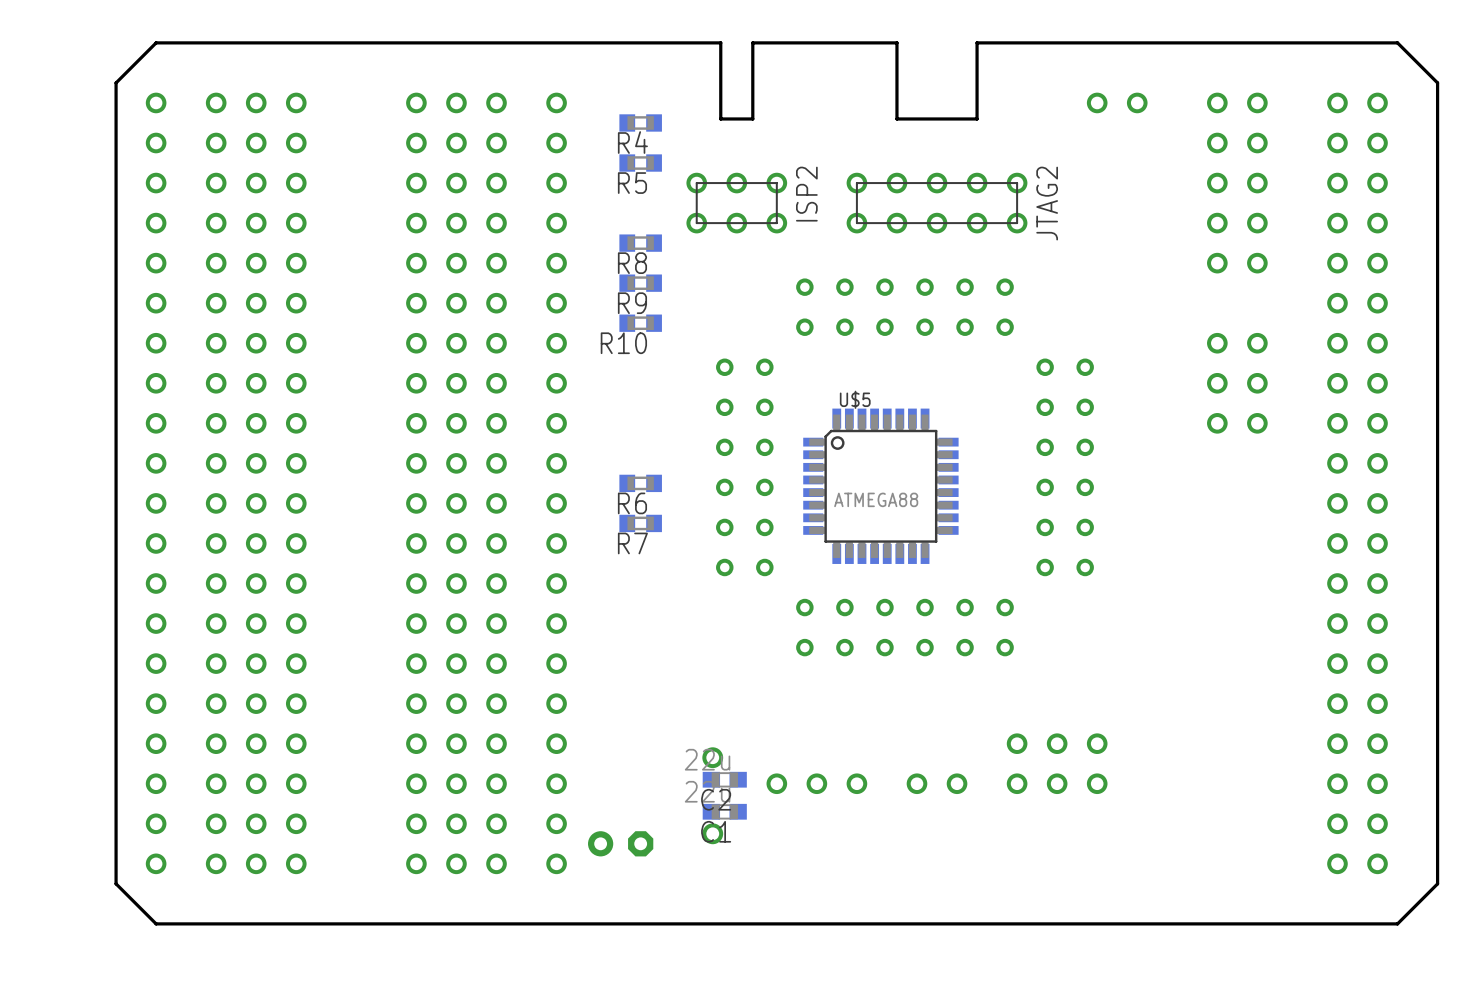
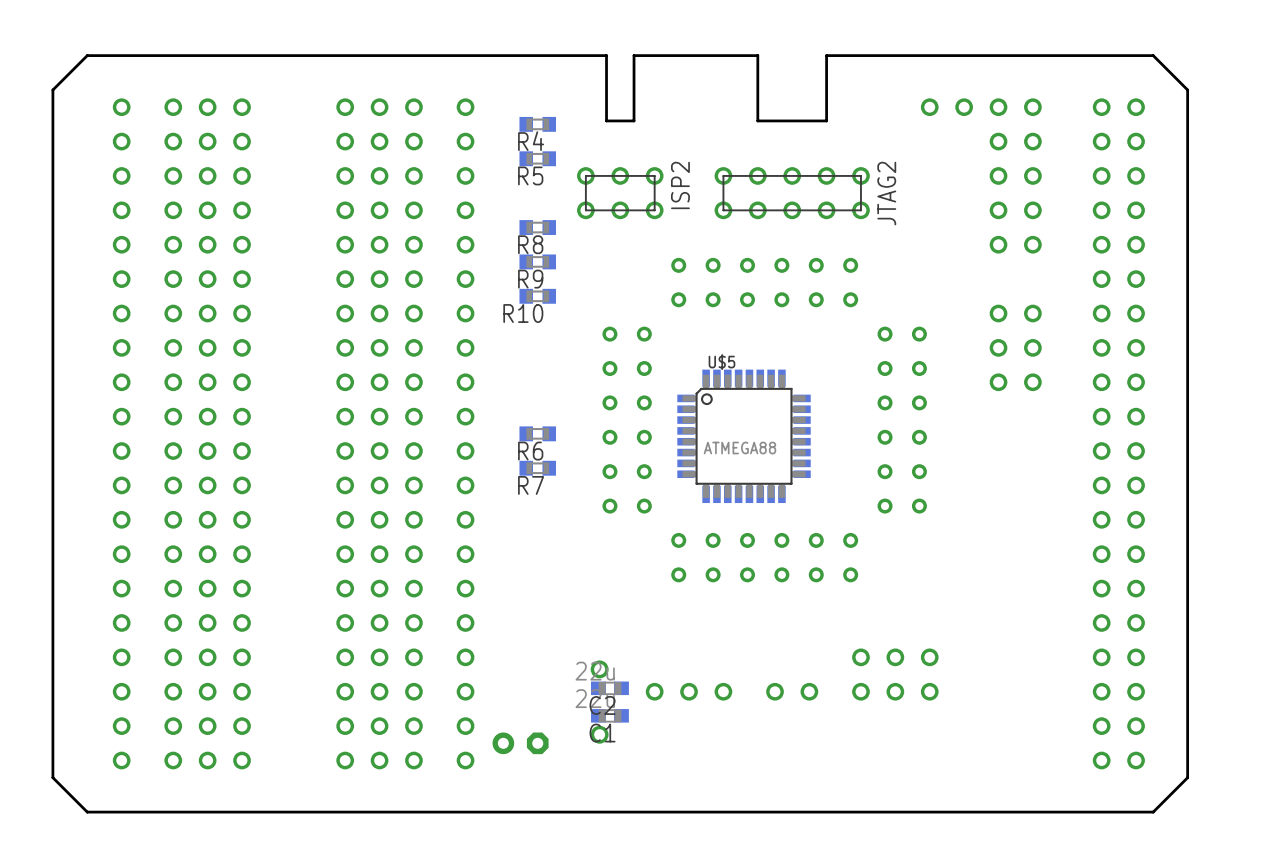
board edge: (156, 42) (116, 82) (116, 883) (156, 923) -> (121, 55) (87, 55) (52, 89) (52, 777) (87, 812) (121, 812)
board edge: (1357, 42) (1397, 42) (1437, 82) (1437, 883) (1397, 923) (1357, 923) -> (1153, 55) (1187, 89) (1187, 777) (1153, 812)
part position: (1237, 183) -> (1015, 175)
part position: (1237, 383) -> (1015, 347)
part position: (1357, 483) -> (1118, 433)

